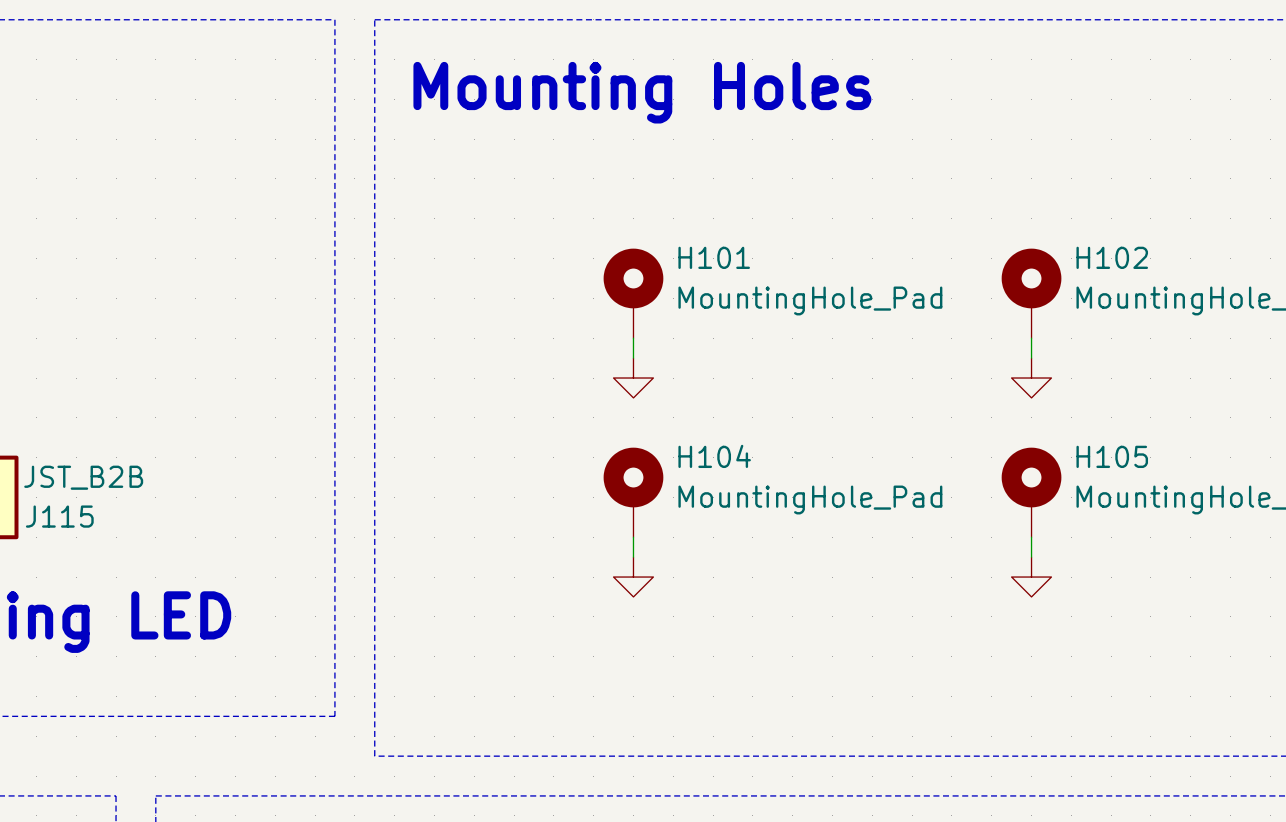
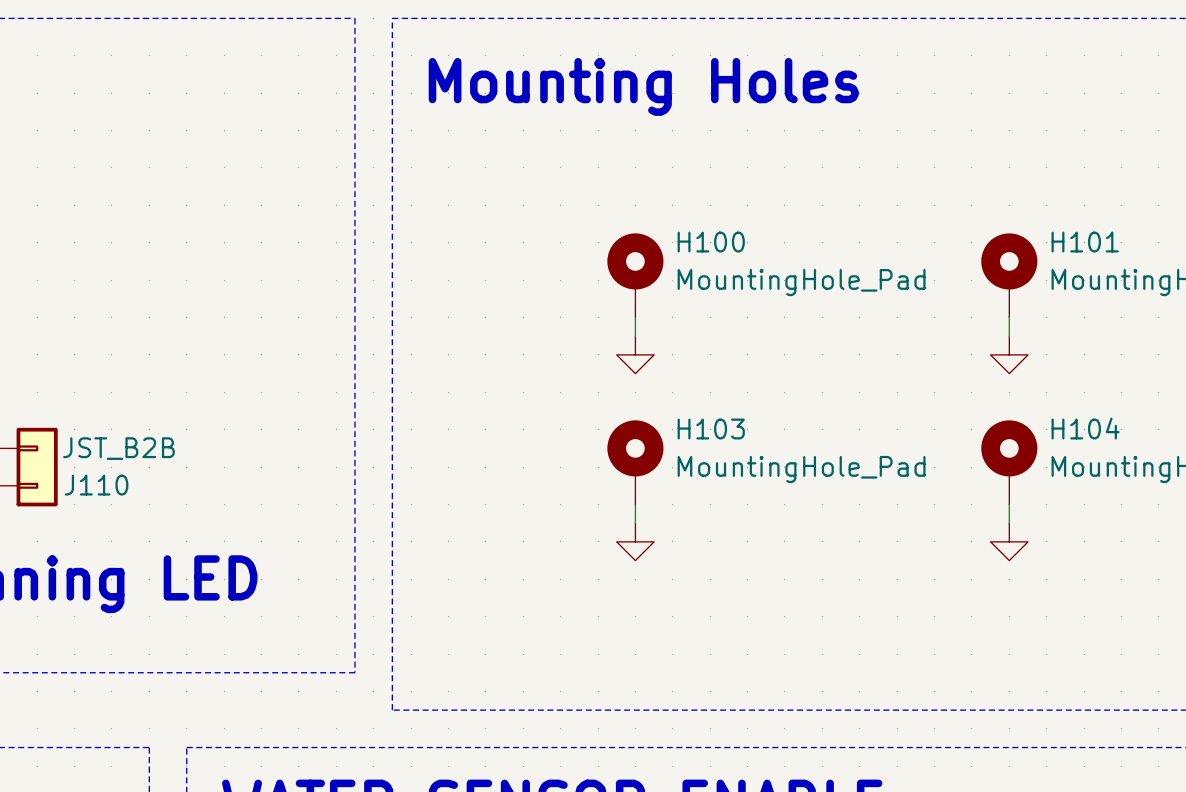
H101 name: H101 (714, 257) -> H100 (711, 242)
H102 name: H102 (1112, 257) -> H101 (1085, 242)
H104 name: H104 (714, 456) -> H103 (711, 429)
H105 name: H105 (1112, 456) -> H104 (1085, 428)
J115 name: J115 (59, 516) -> J110 (96, 485)

